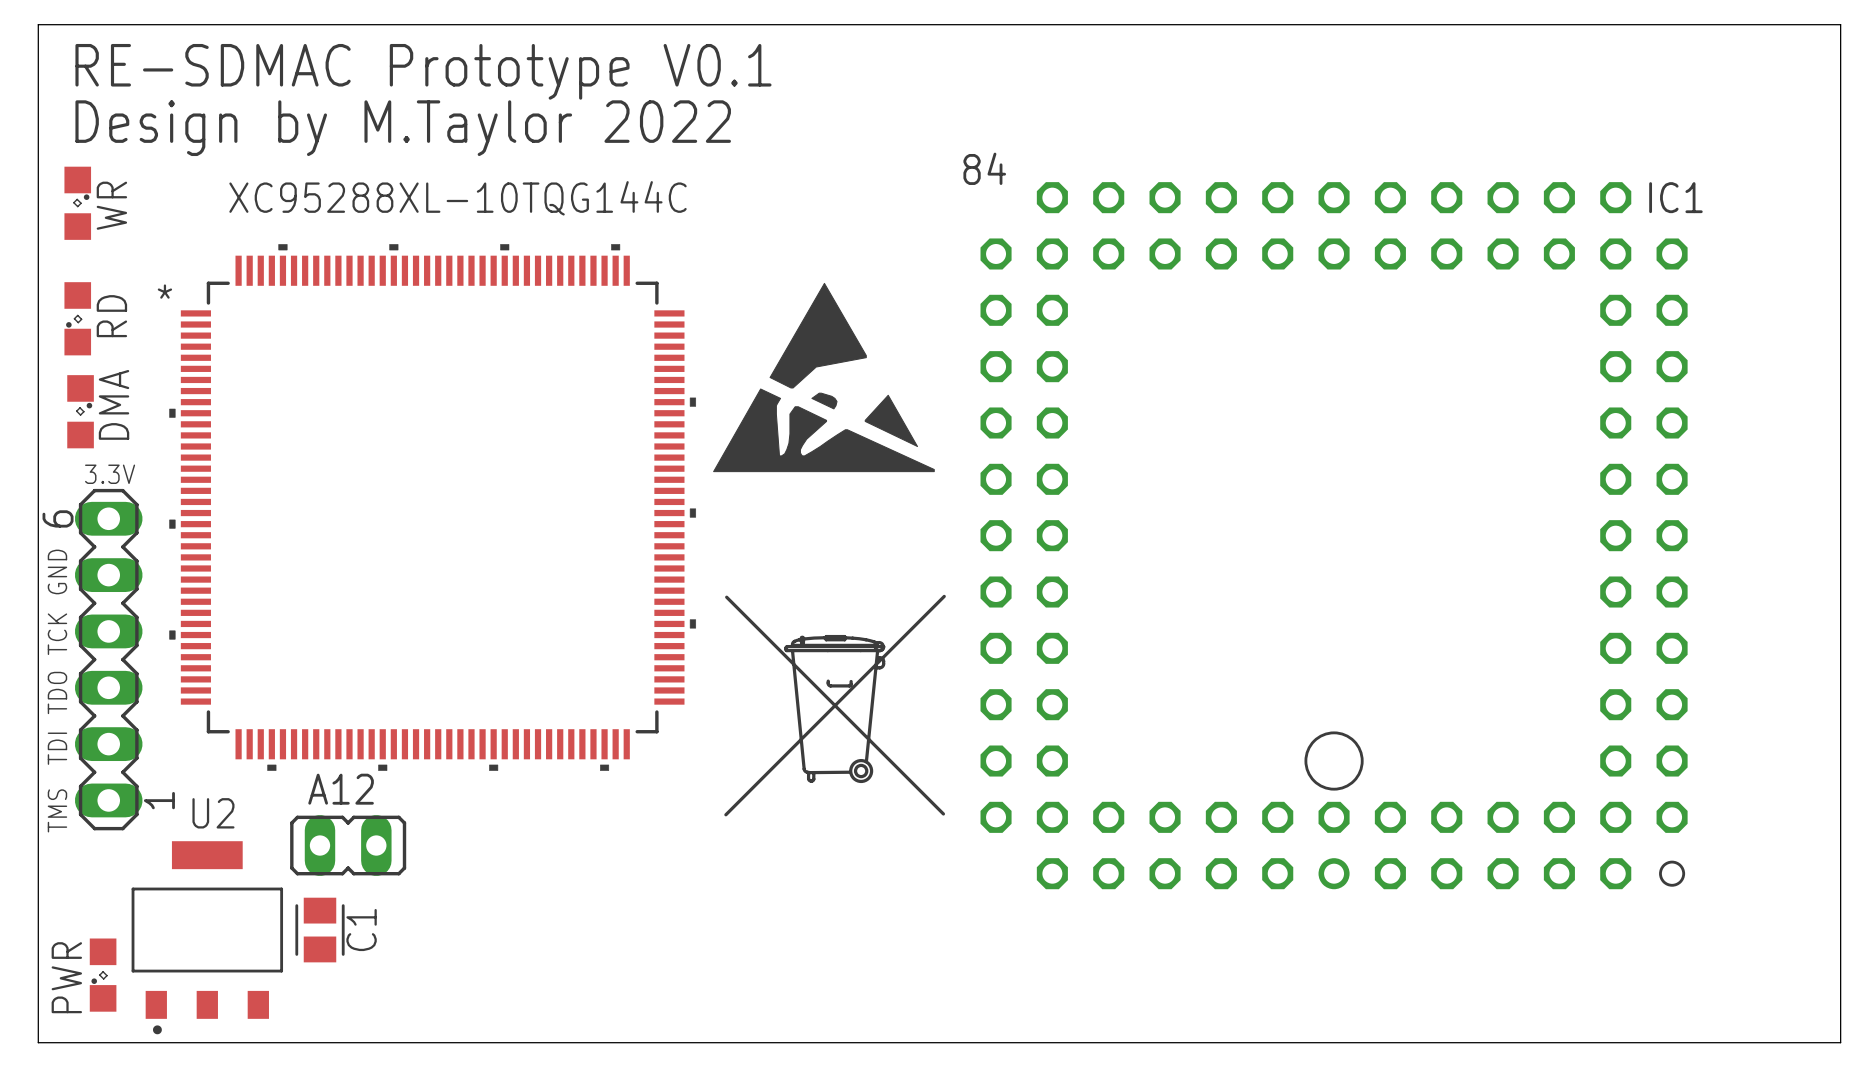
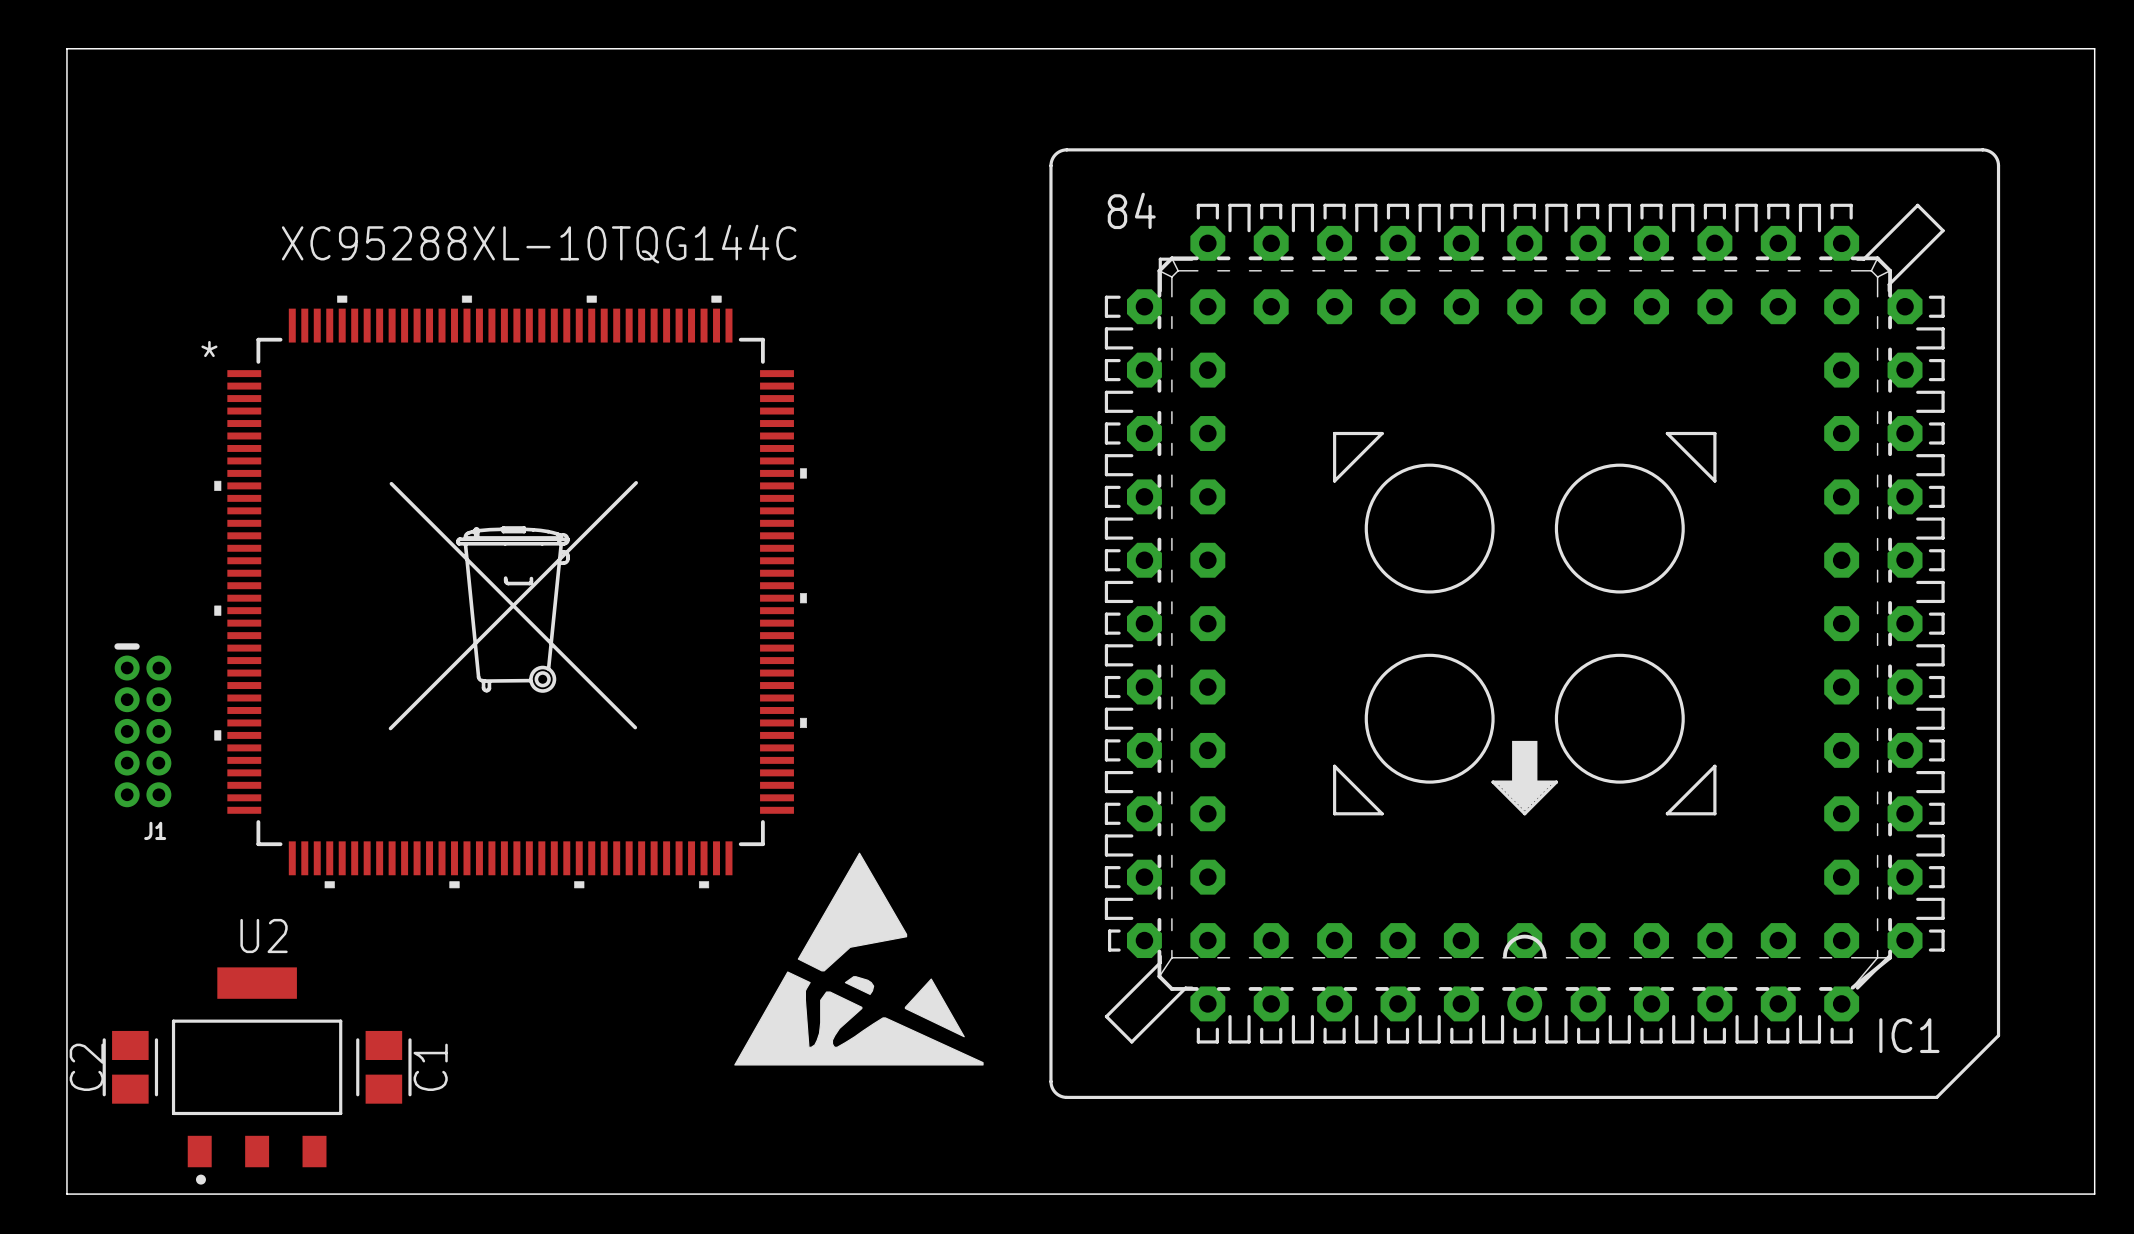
text: RE-SDMAC Prototype V0.1 (423, 71) -> none
text: Design by M.Taylor 2022 (403, 128) -> none
IC1 footprint: [980, 182, 1688, 890] -> [1049, 148, 2001, 1100]
IC1 name position: IC1 (1675, 197) -> IC1 (1909, 1035)
WR: (77, 203) -> none
RD: (77, 318) -> none
drawing position: (823, 377) -> (858, 959)
DMA: (80, 411) -> none
text: 3.3V (110, 474) -> none
text: GND (57, 571) -> none
J1: none -> (142, 725)
text: TCK (57, 634) -> none
part: (108, 659) -> none
text: TDO (57, 692) -> none
drawing position: (835, 705) -> (513, 605)
text: TDI (57, 748) -> none
text: TMS (57, 810) -> none
A12: (348, 845) -> none
C2: none -> (130, 1067)
PWR: (103, 975) -> none

